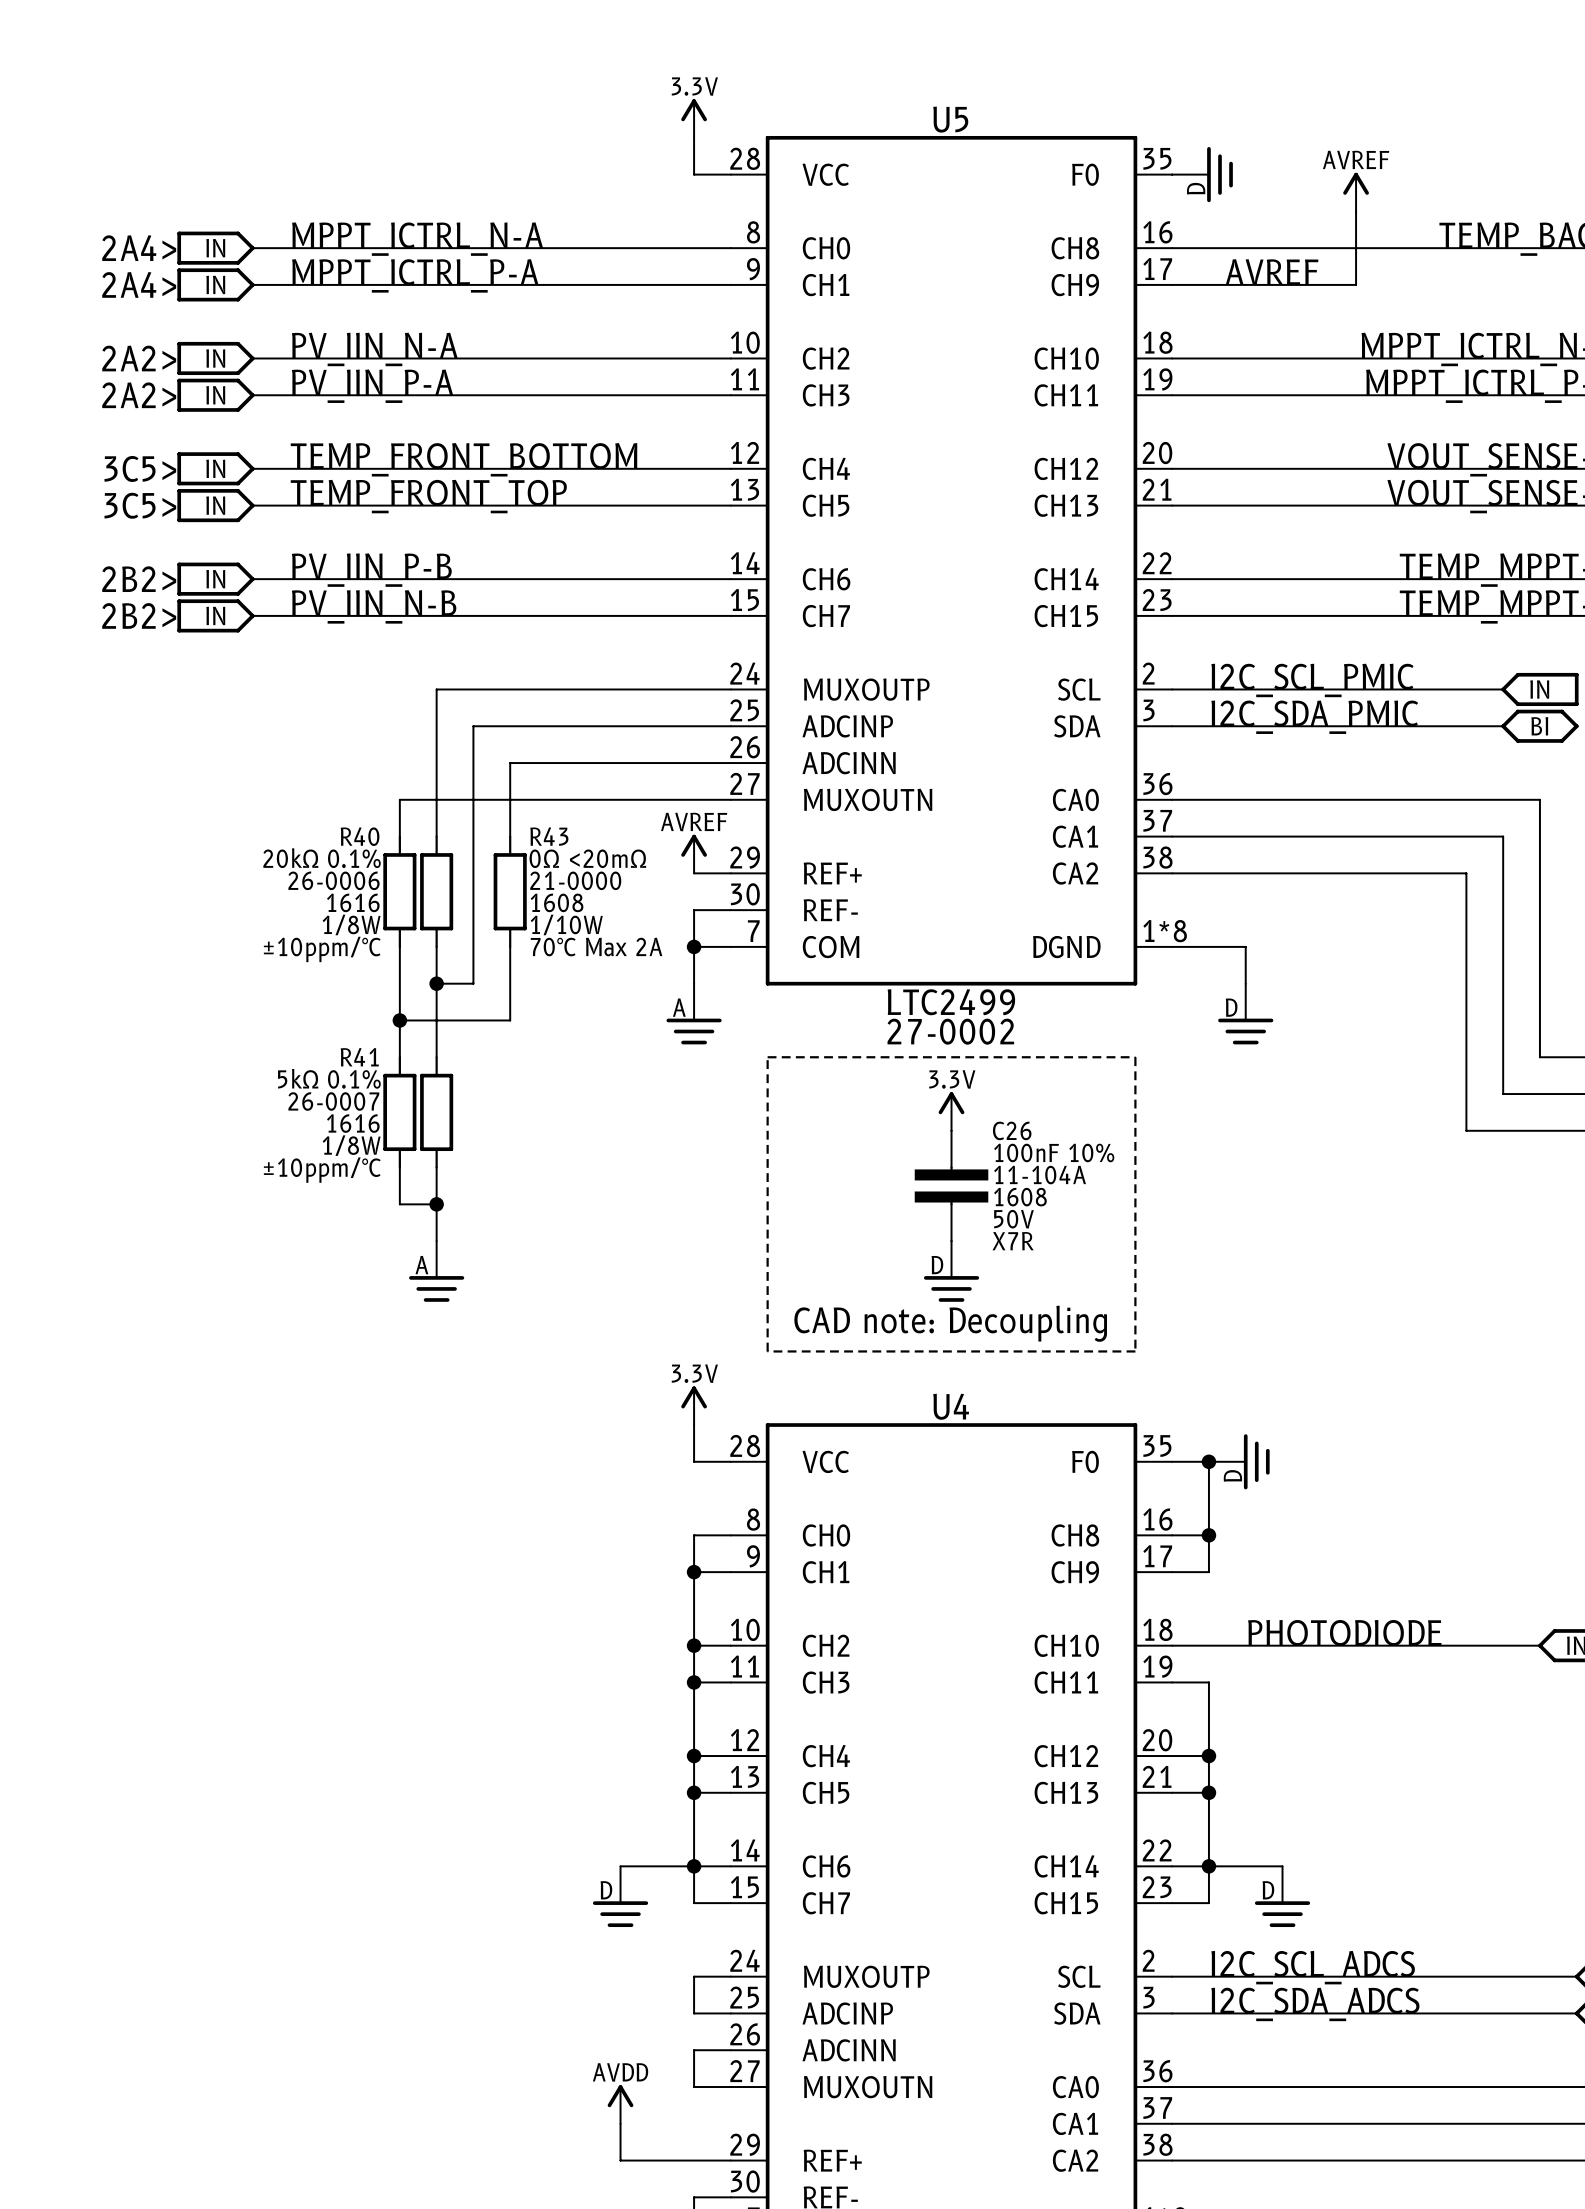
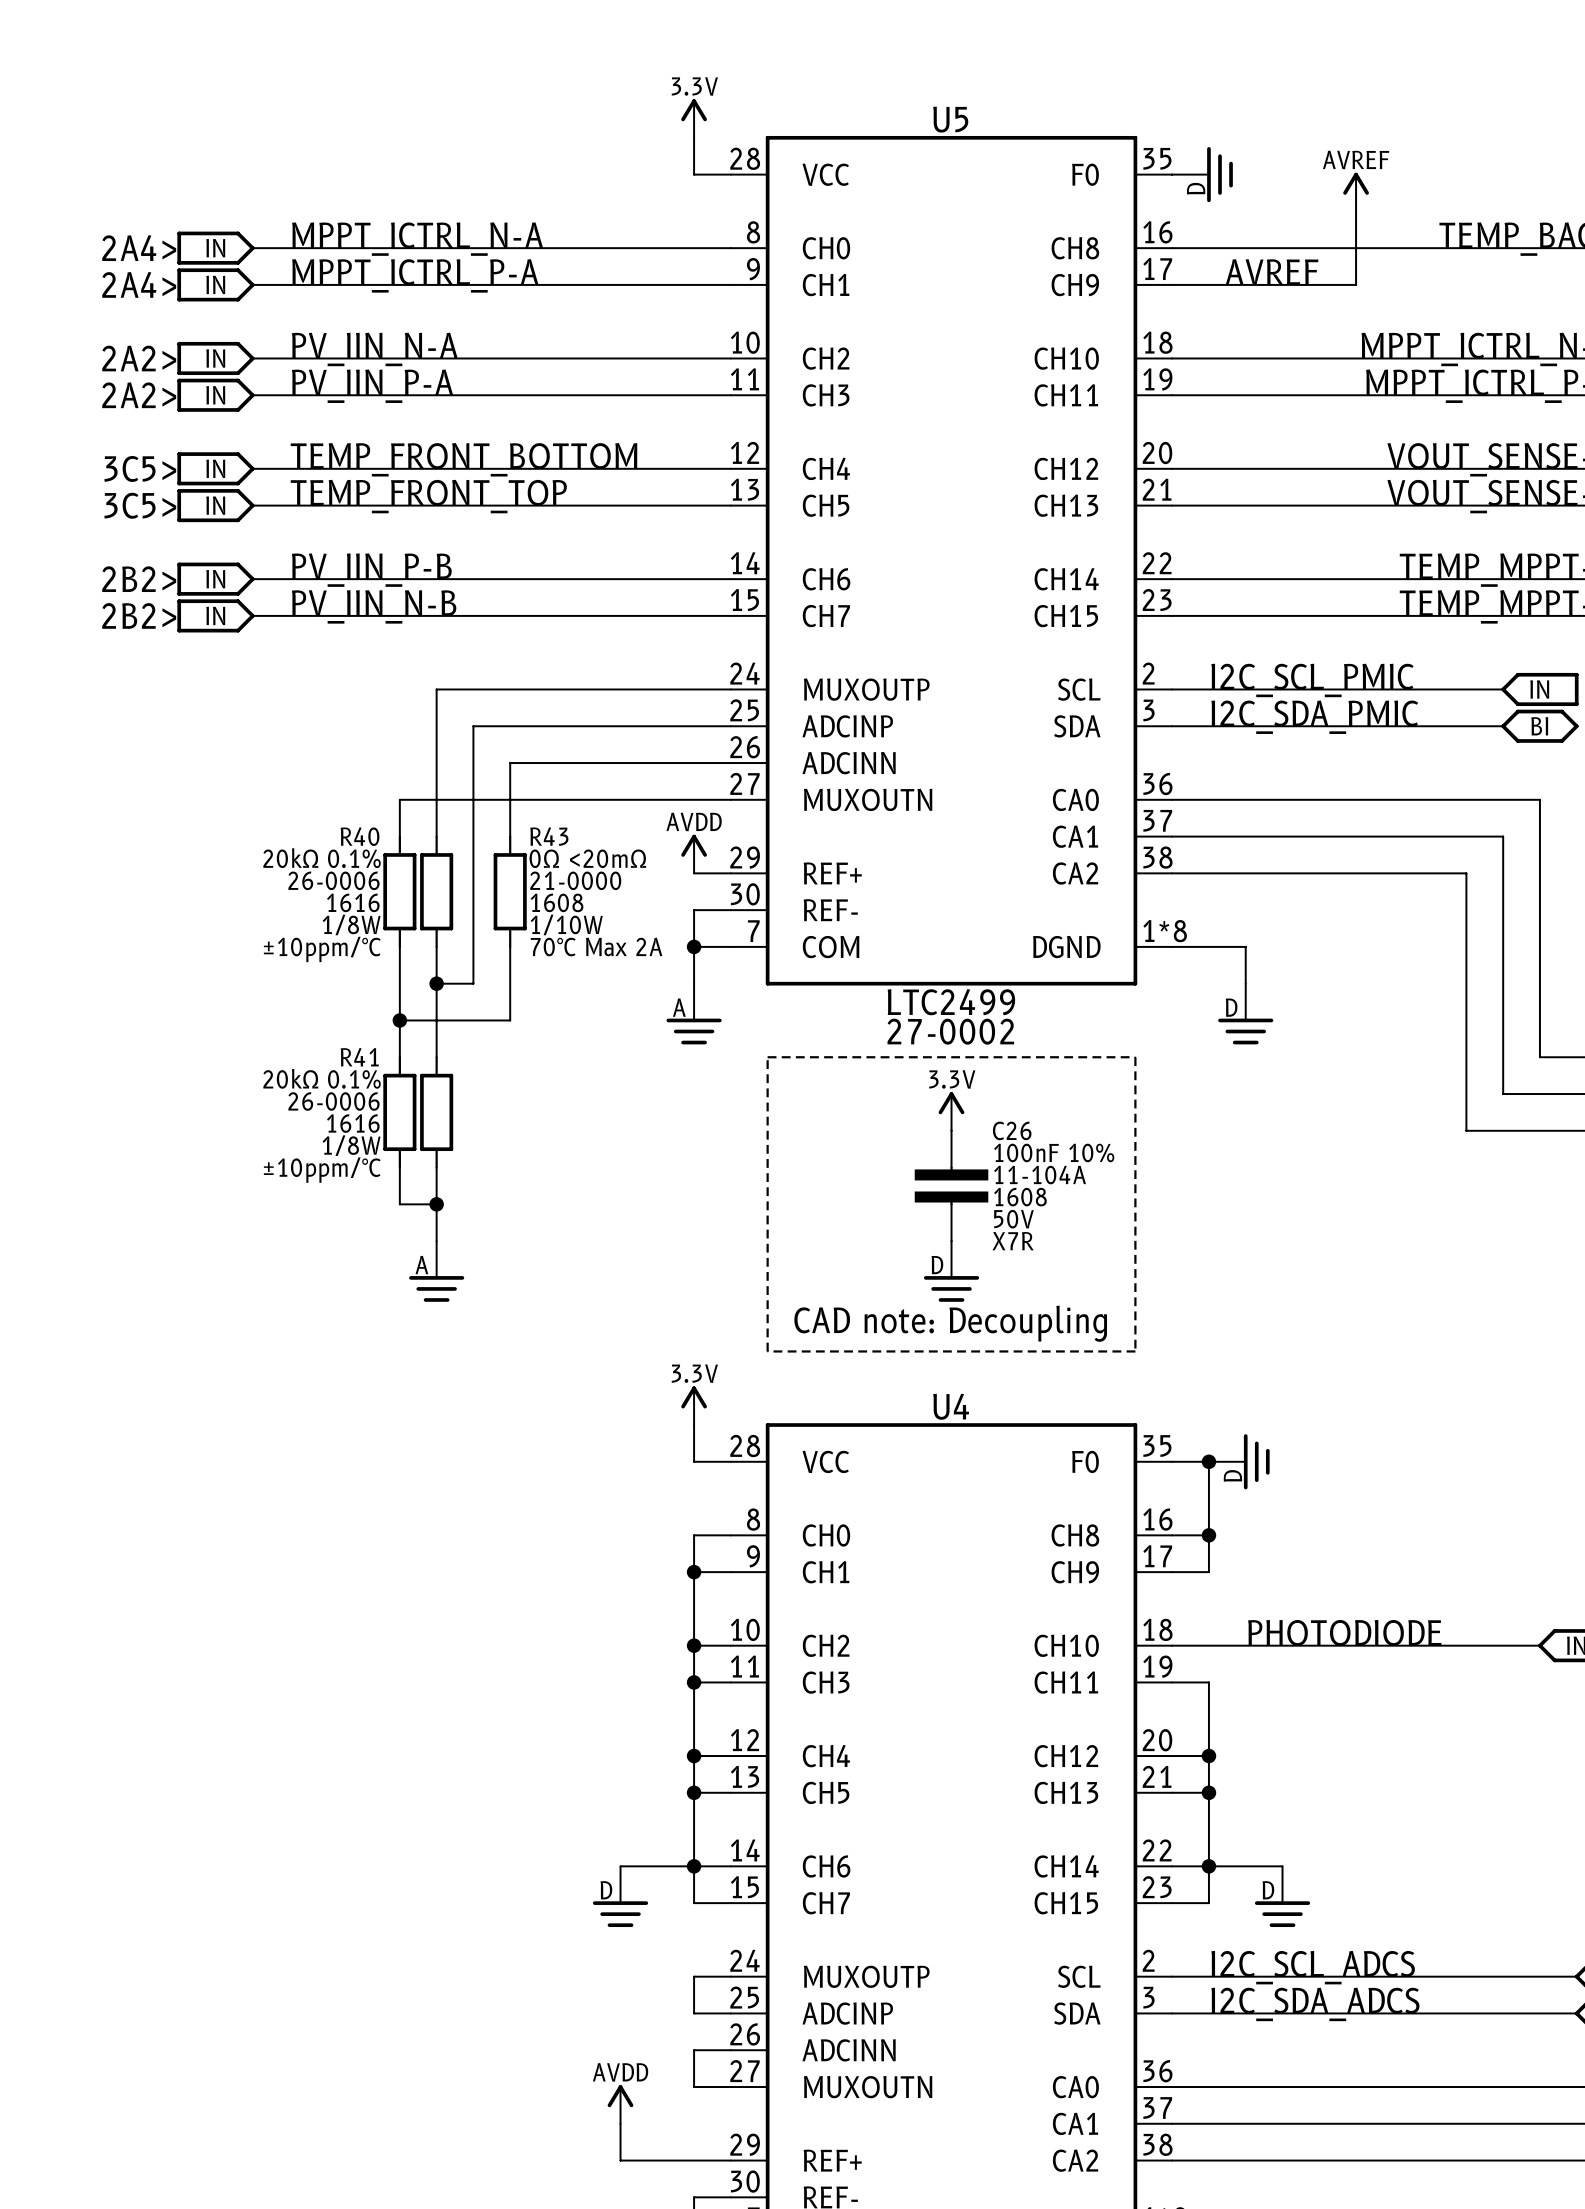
power symbol: AVREF (694, 854) -> AVDD (694, 854)
R41 value: 5kΩ 0.1% (329, 1078) -> 20kΩ 0.1% (322, 1078)
R41 text: 26-0007 (333, 1101) -> 26-0006 (333, 1101)

